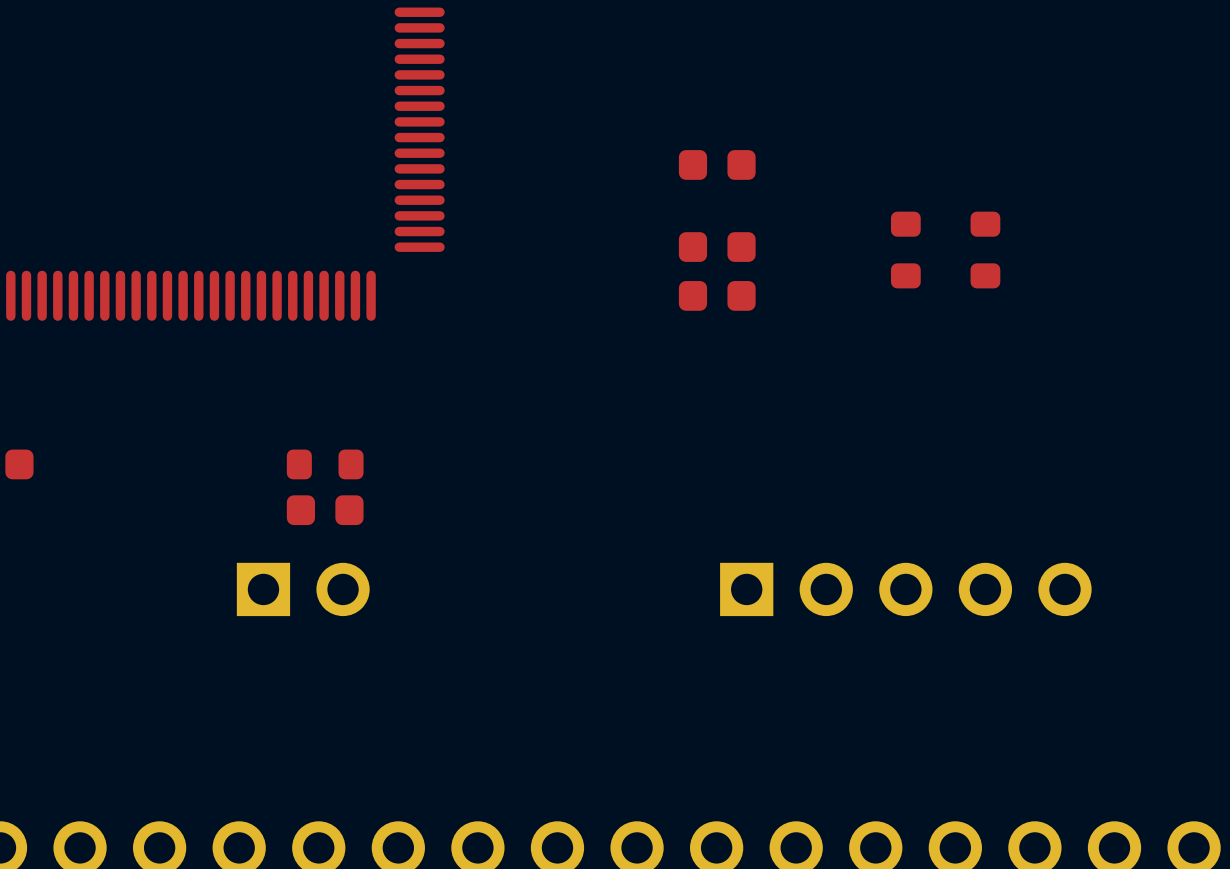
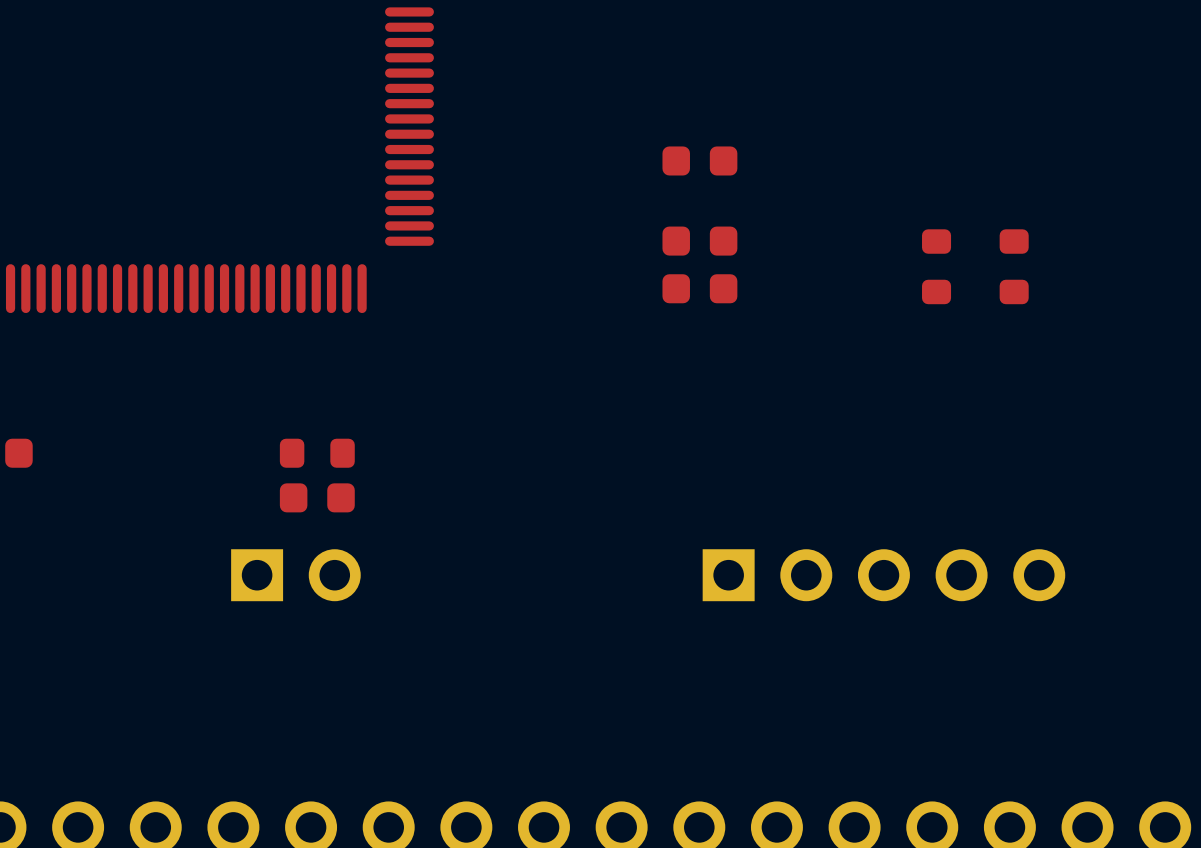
part: (905, 250) -> none
part: (985, 250) -> none
part: none -> (936, 266)
part: none -> (1014, 266)

